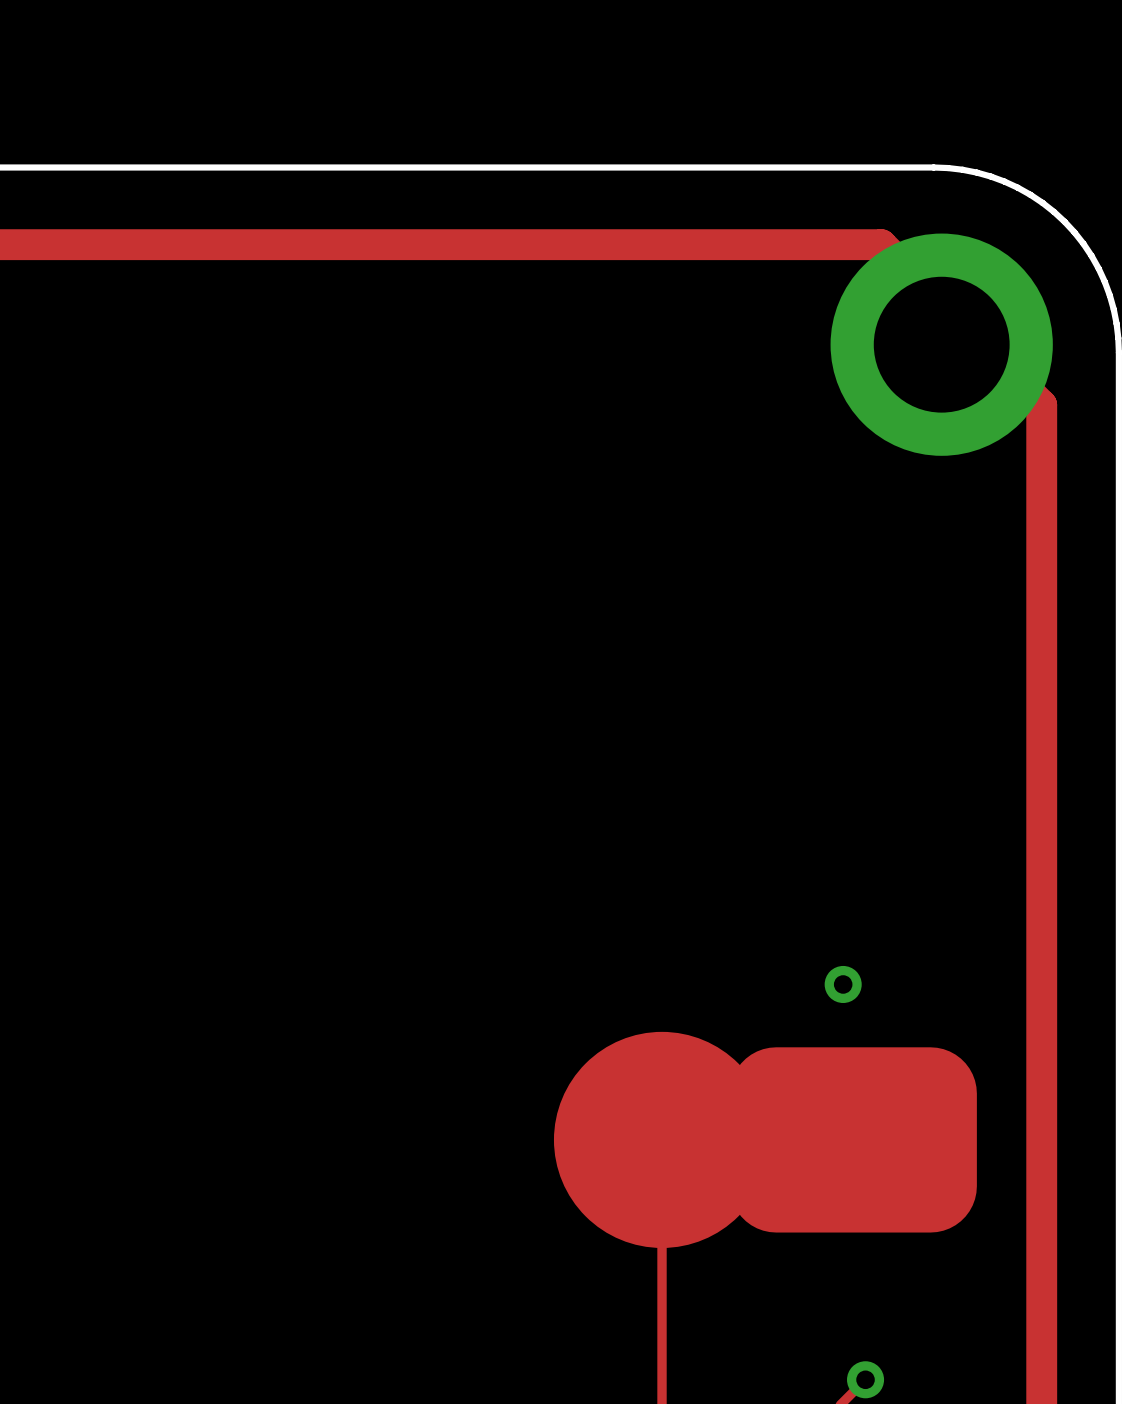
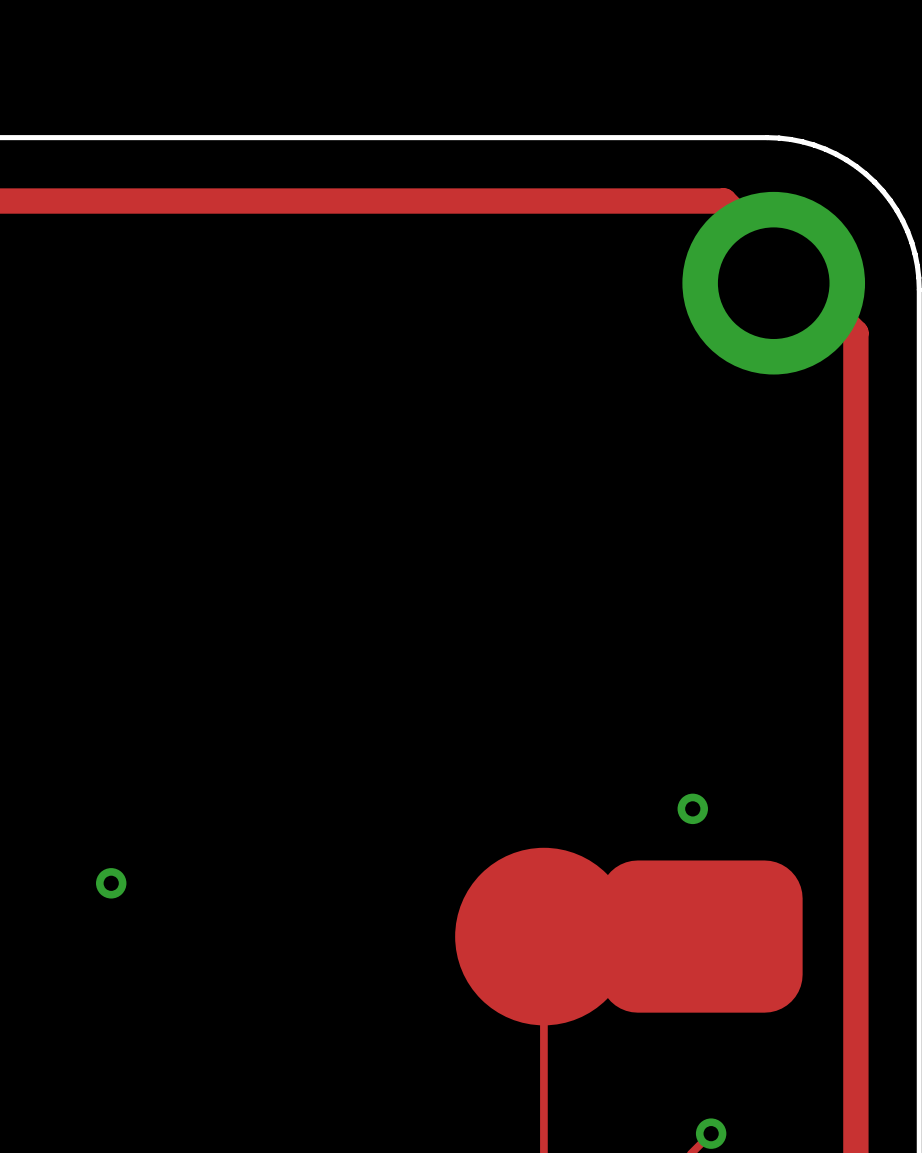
via: none -> (111, 883)

